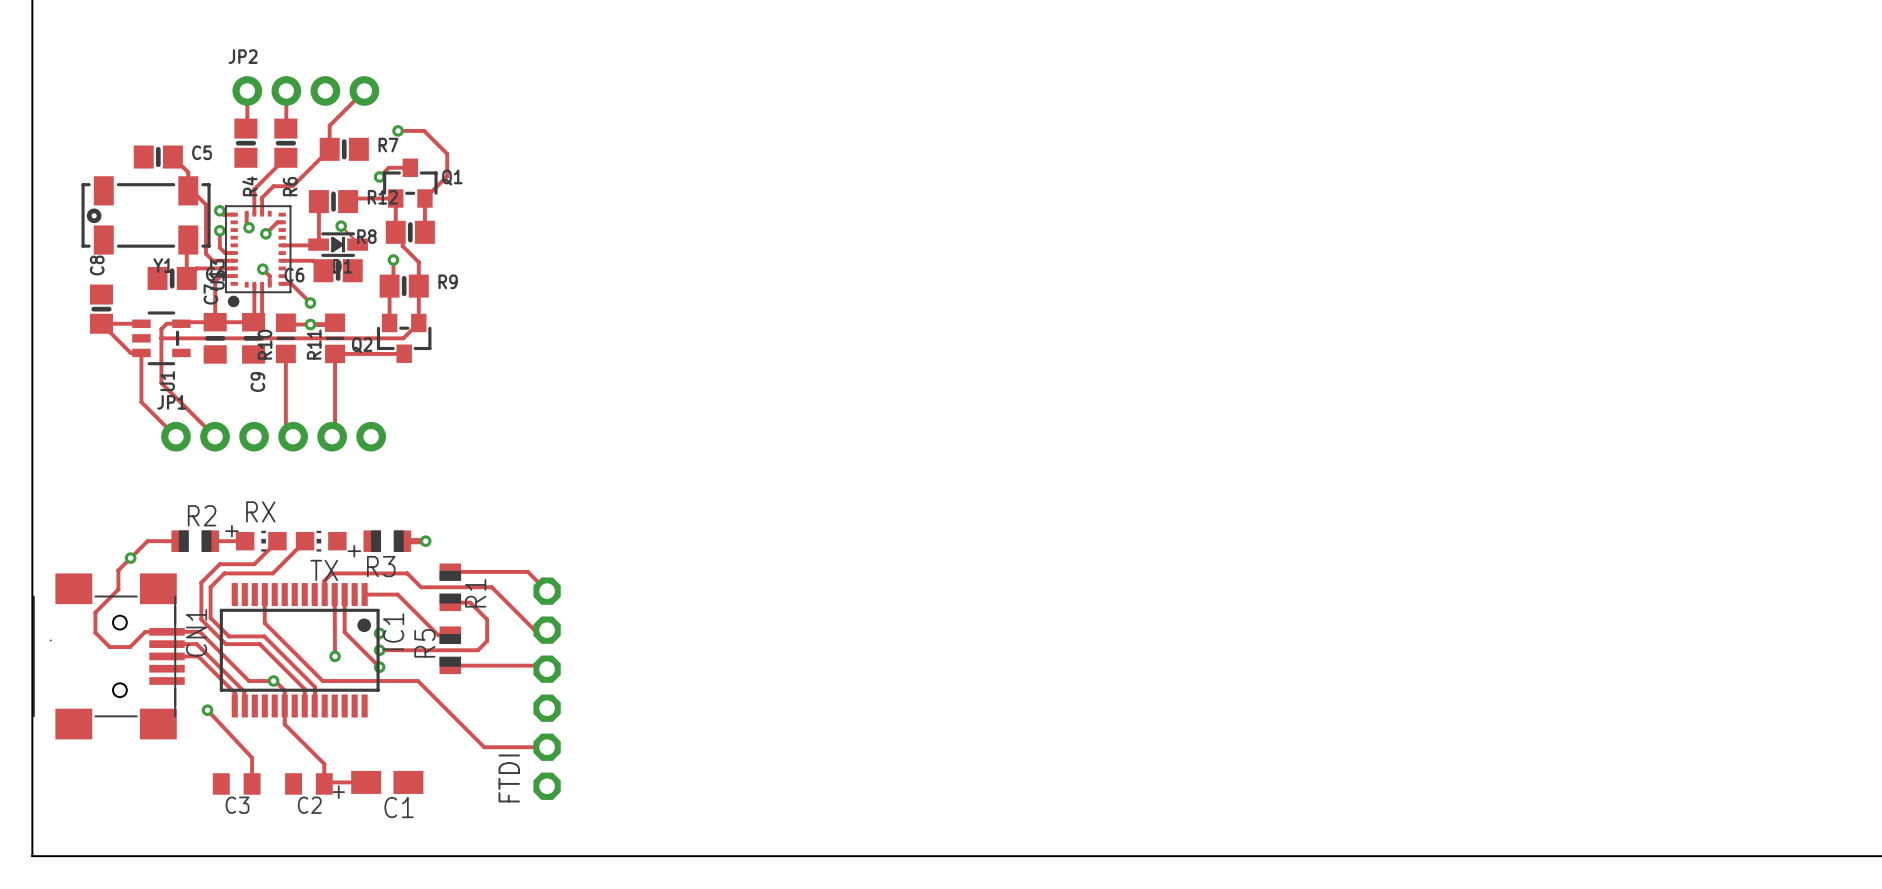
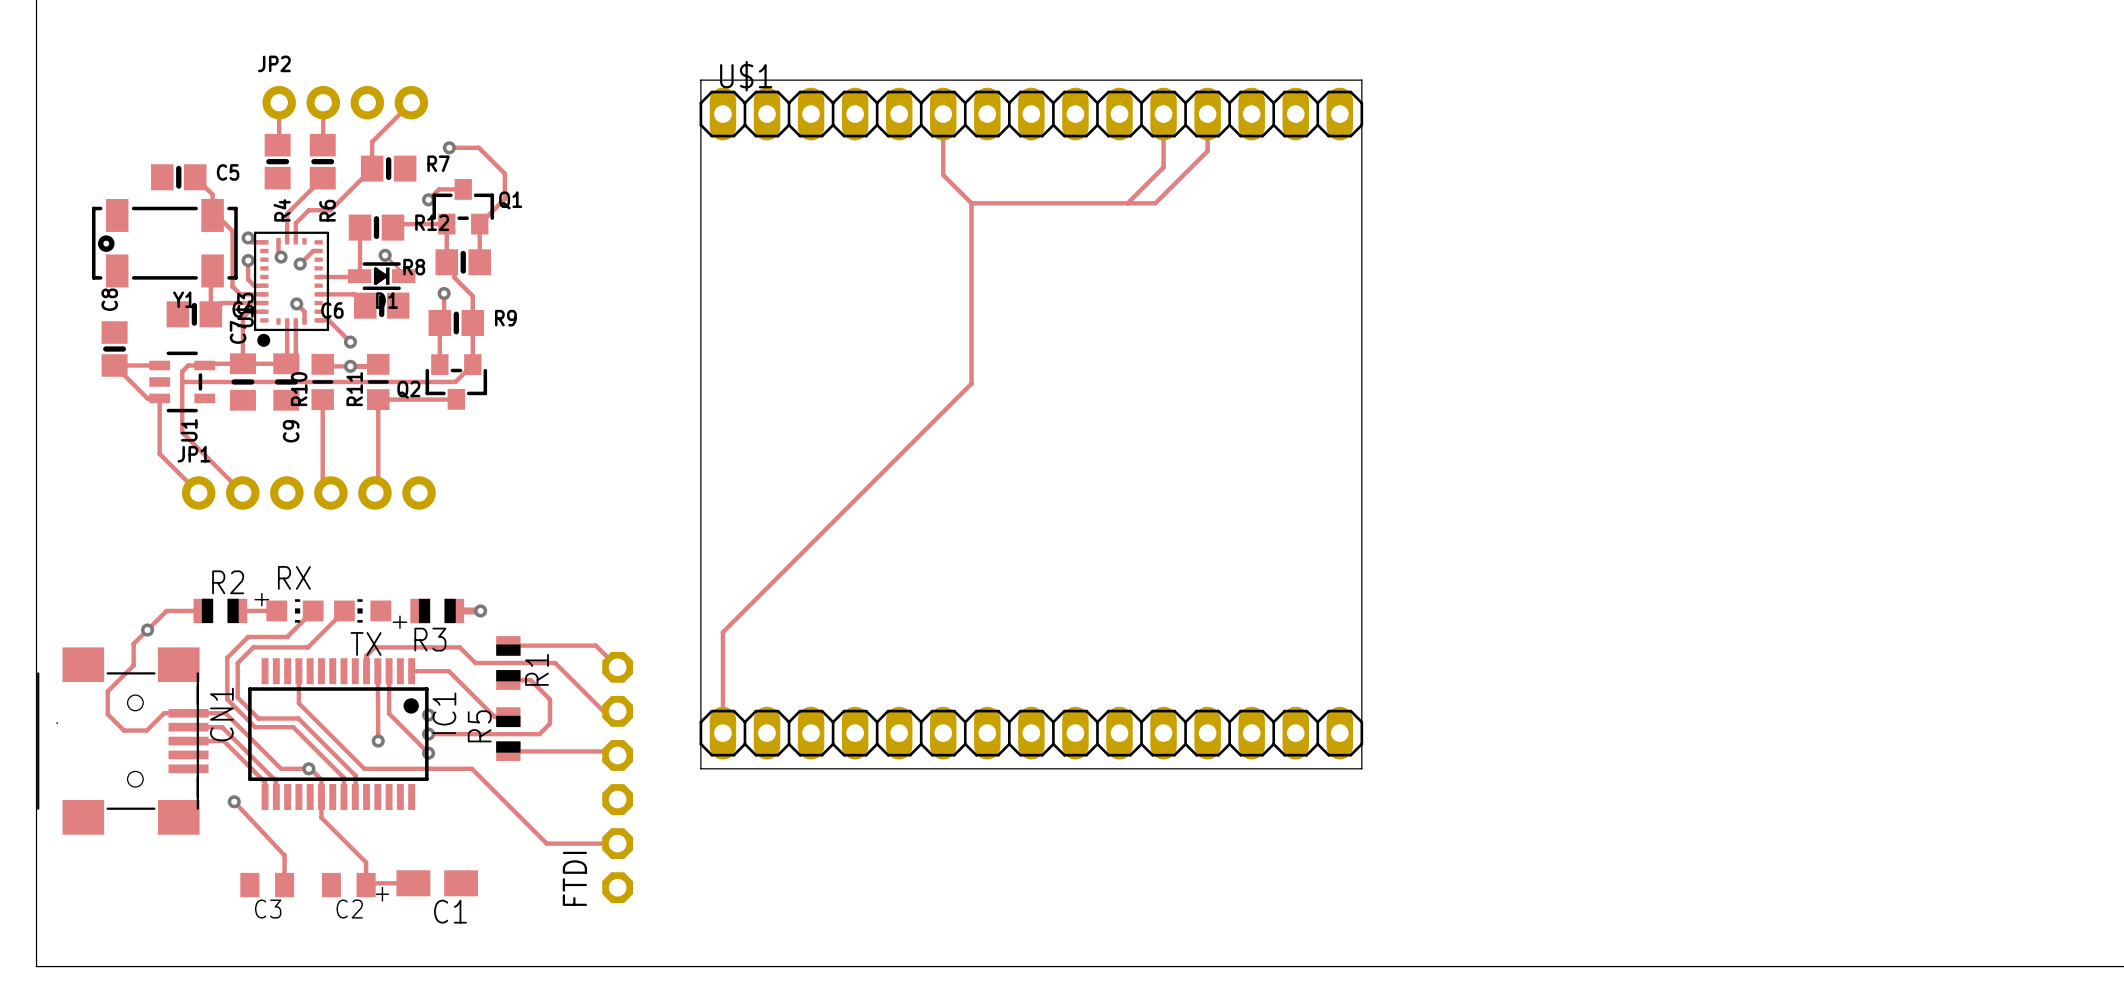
track: none -> (943, 114) (943, 175) (971, 203)
track: none -> (1163, 114) (1163, 167) (1127, 203)
track: none -> (1207, 114) (1207, 151) (1155, 203) (971, 203)
track: none -> (971, 203) (971, 383) (722, 632) (722, 733)
U$1: none -> (1031, 424)

